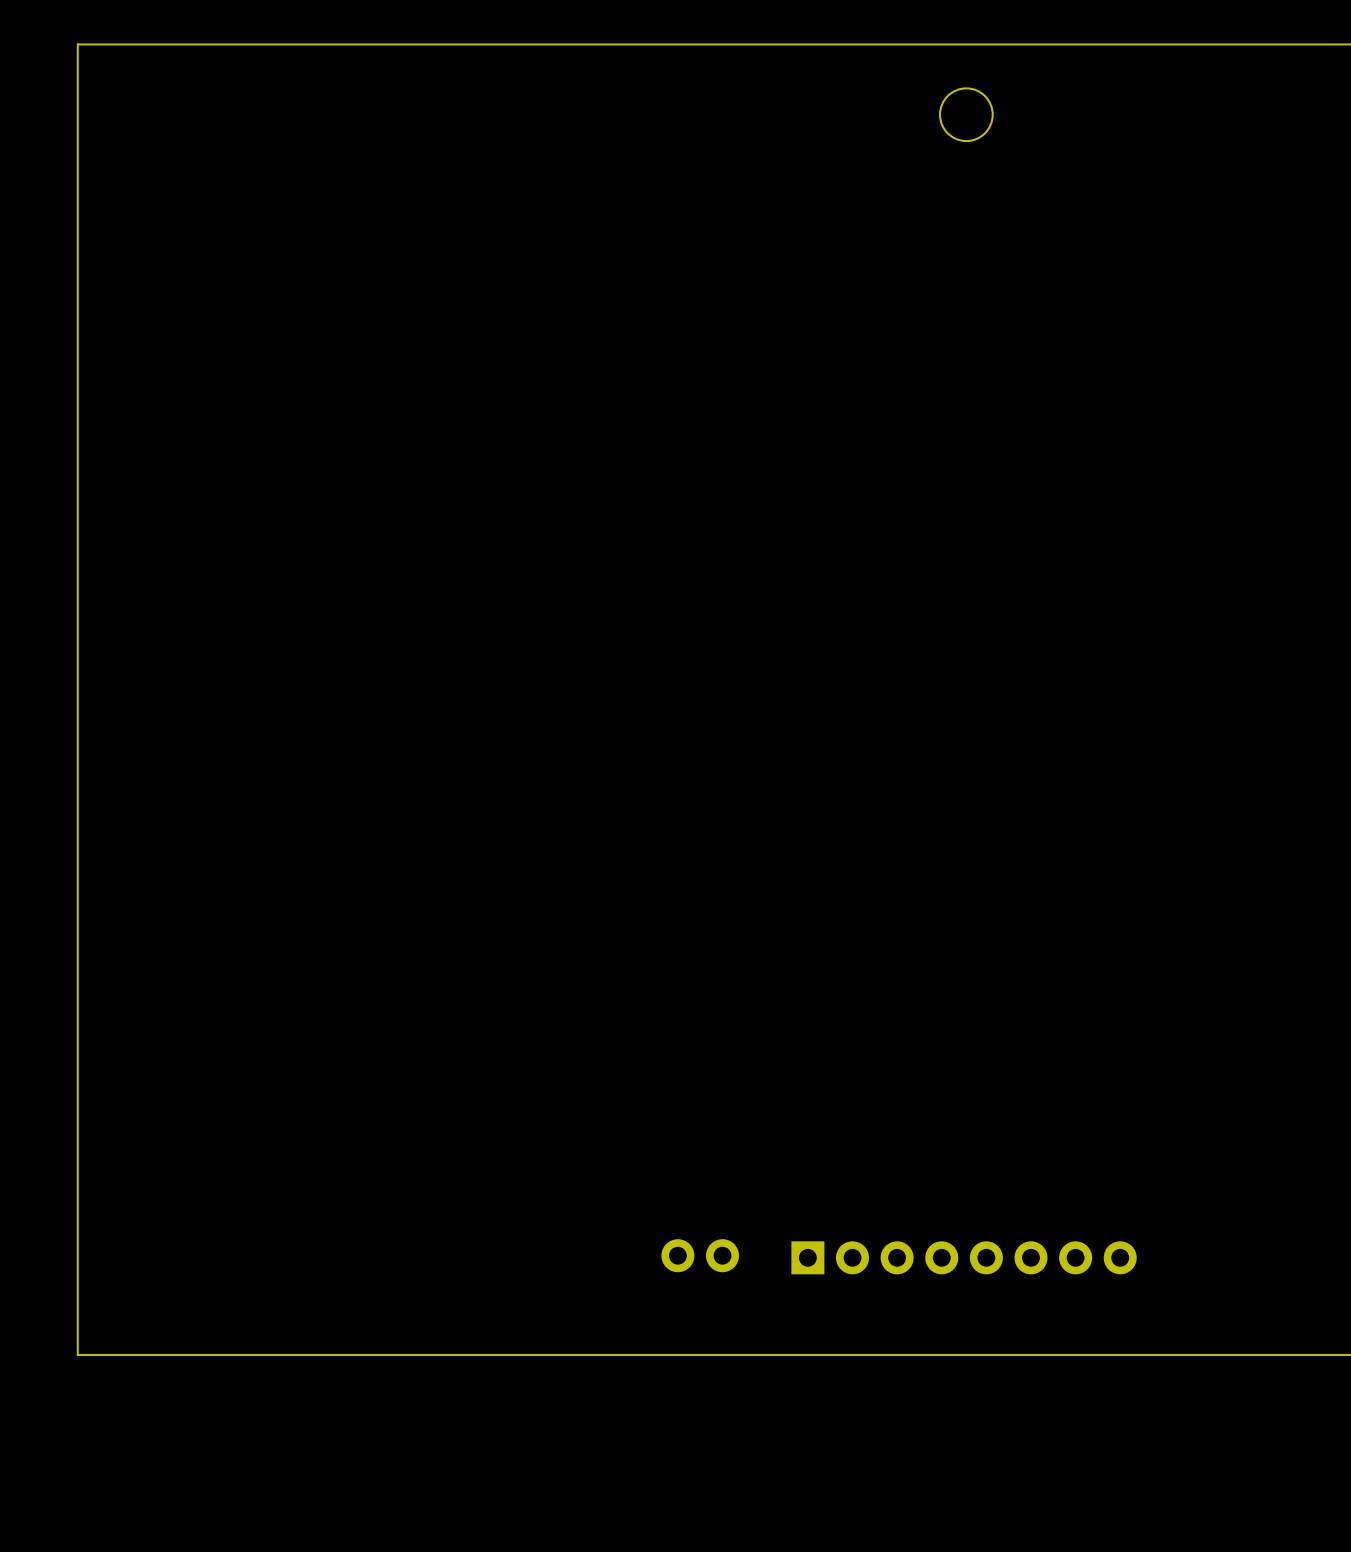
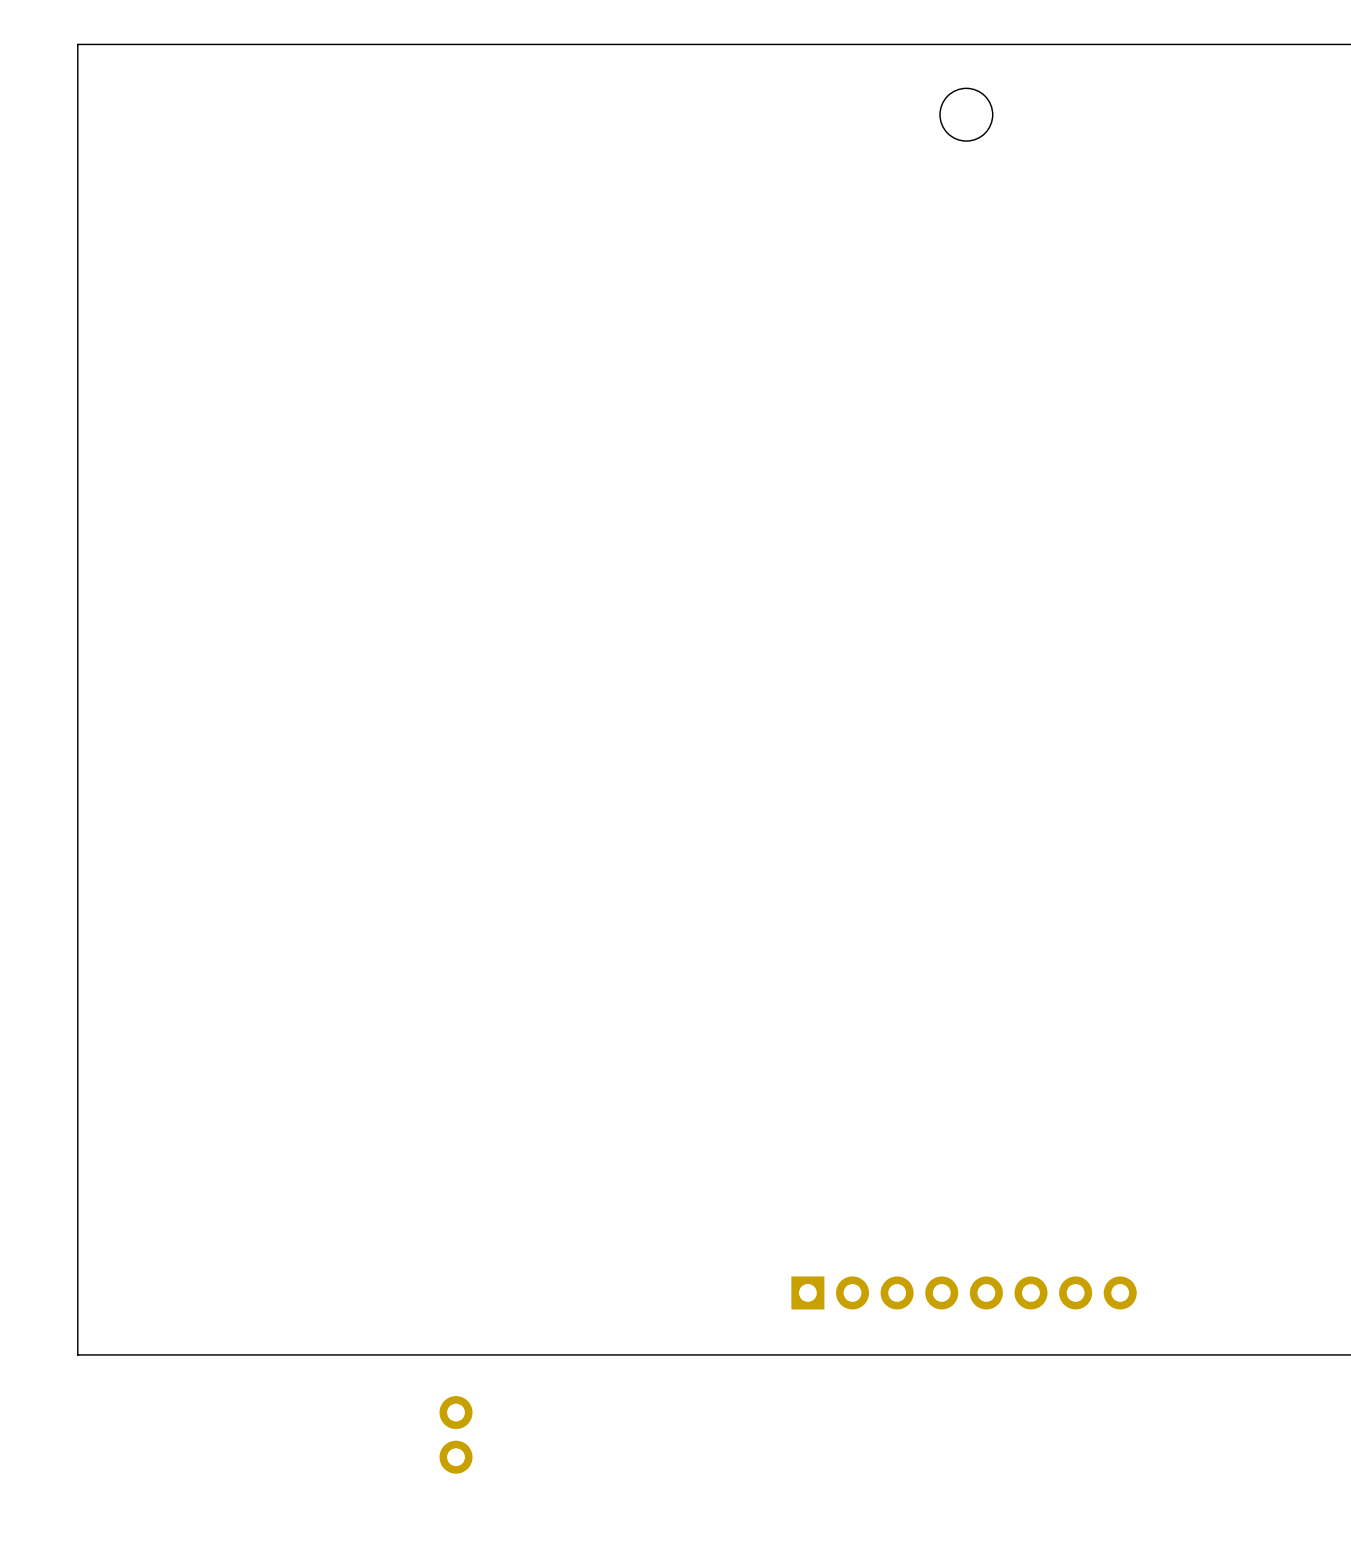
part rotation: 0° (700, 1255) -> 90° clockwise (456, 1434)
part position: (700, 1255) -> (456, 1434)
part position: (964, 1257) -> (964, 1292)

